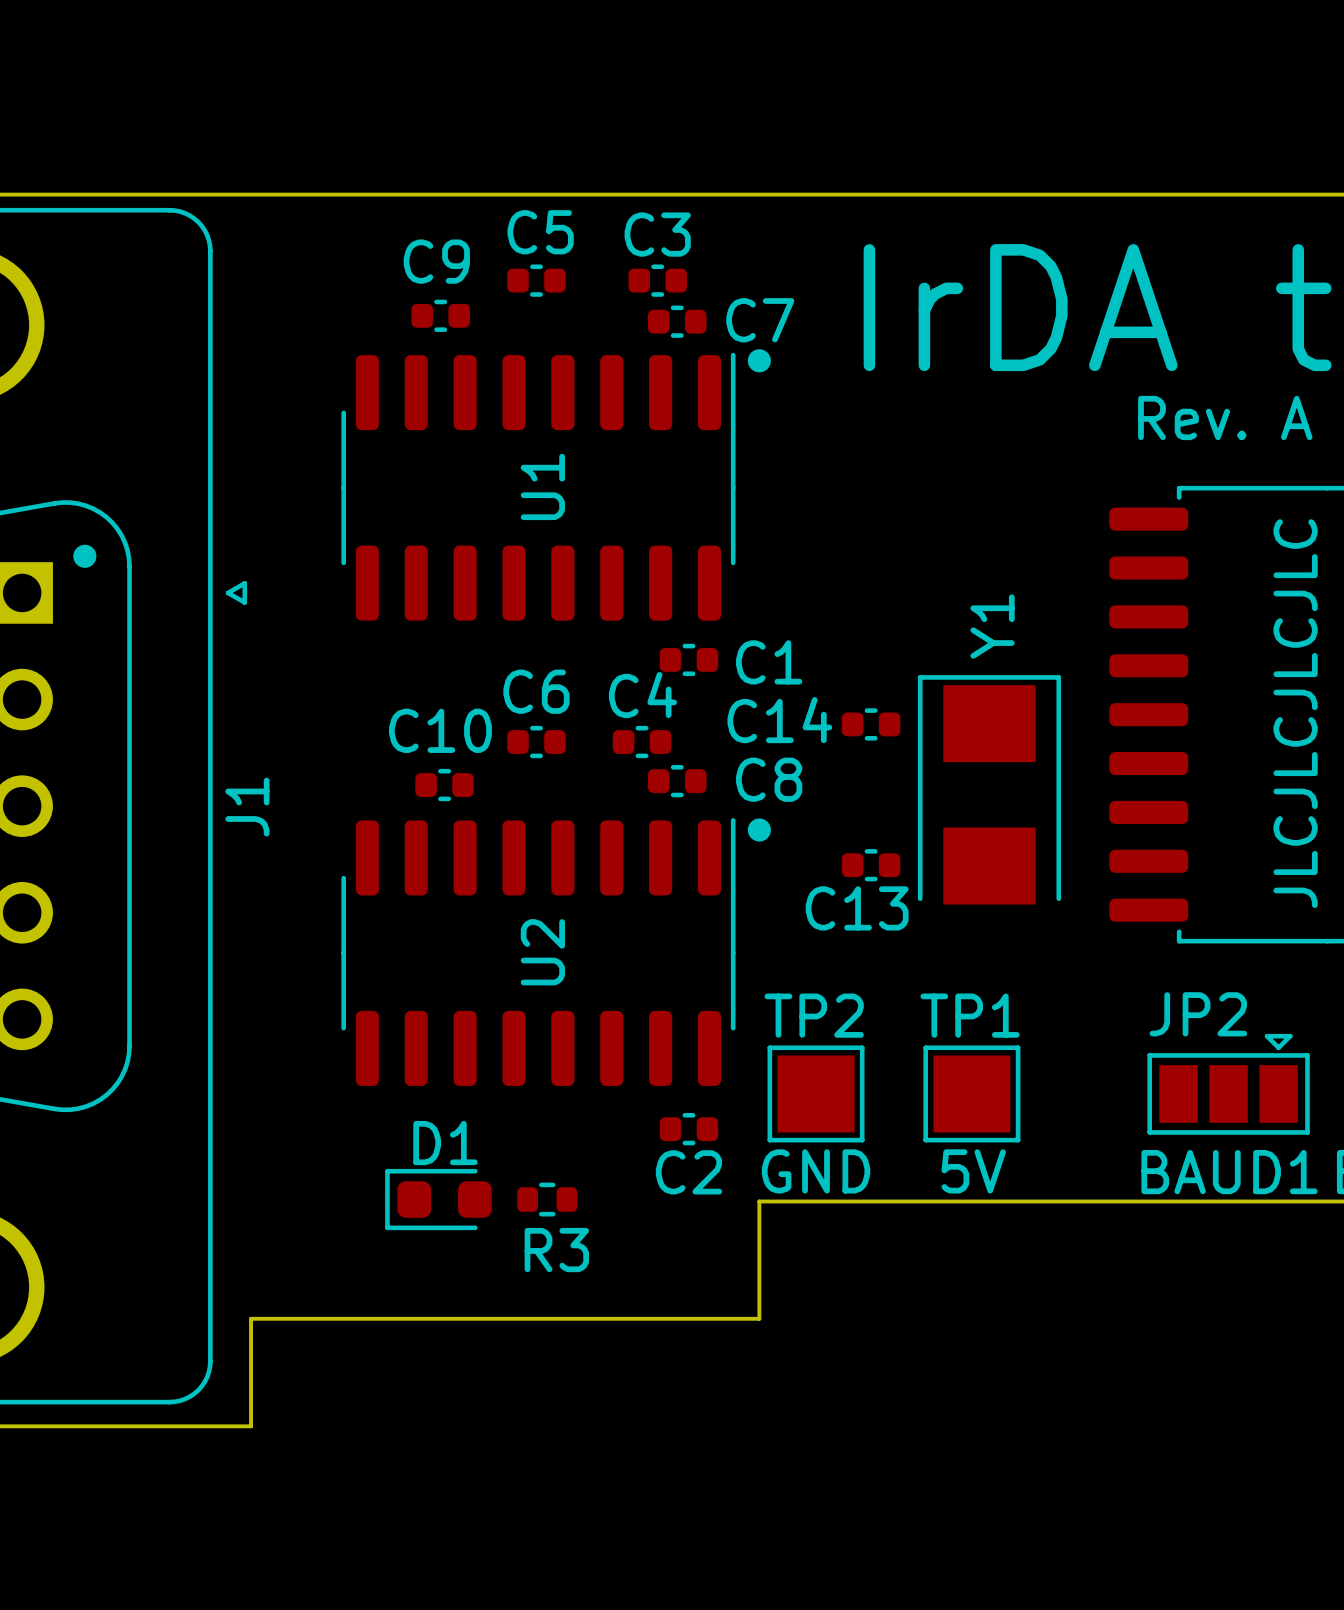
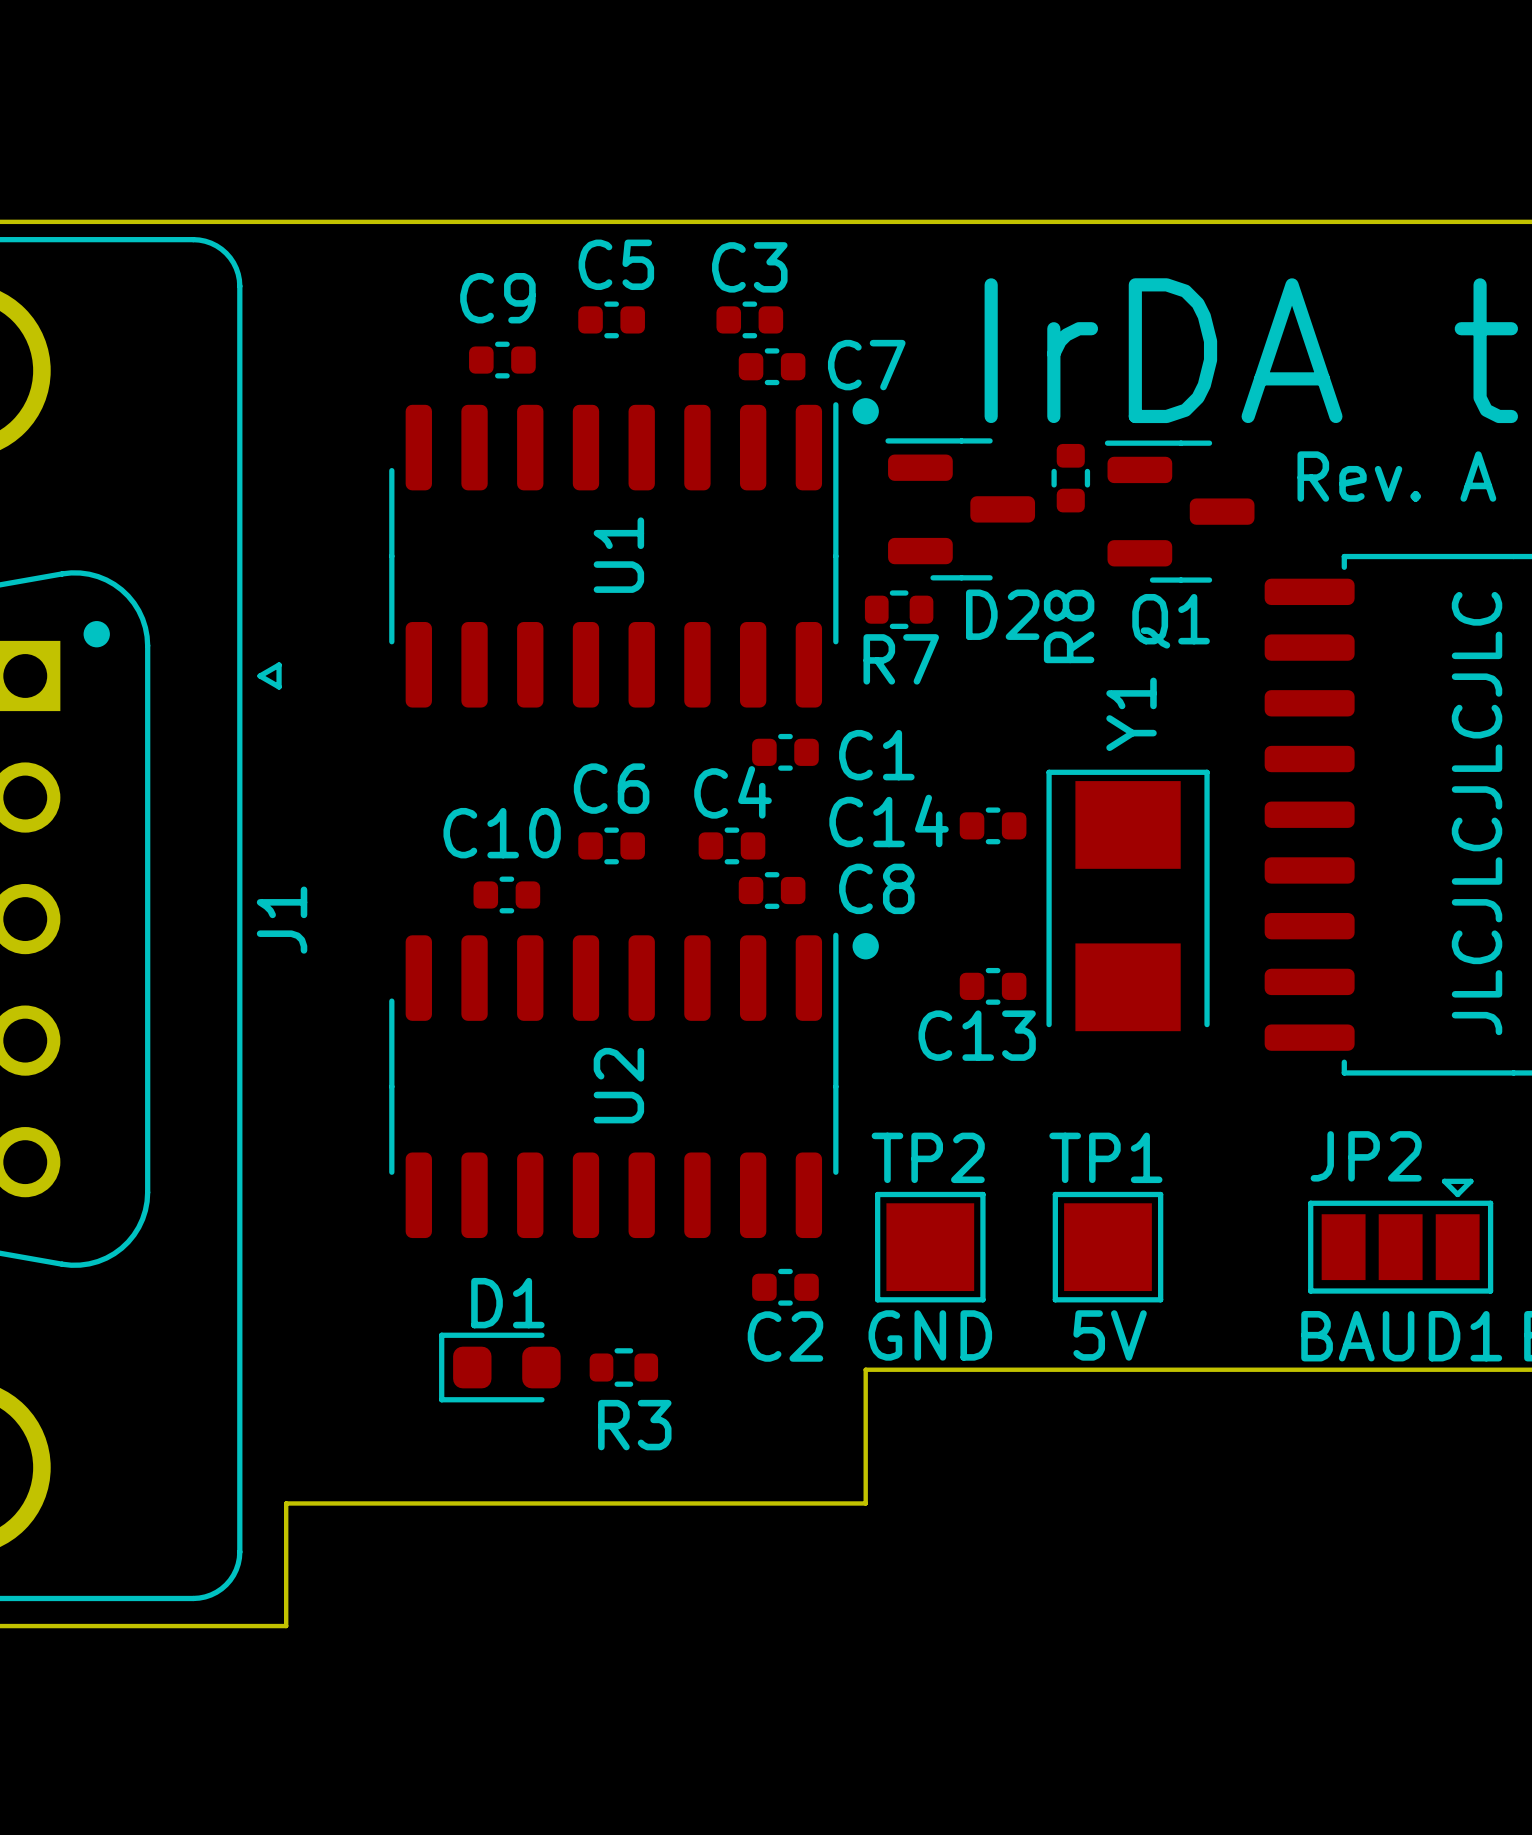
R8: none -> (1070, 478)
D2: none -> (960, 509)
Q1: none -> (1179, 511)
R7: none -> (899, 609)

